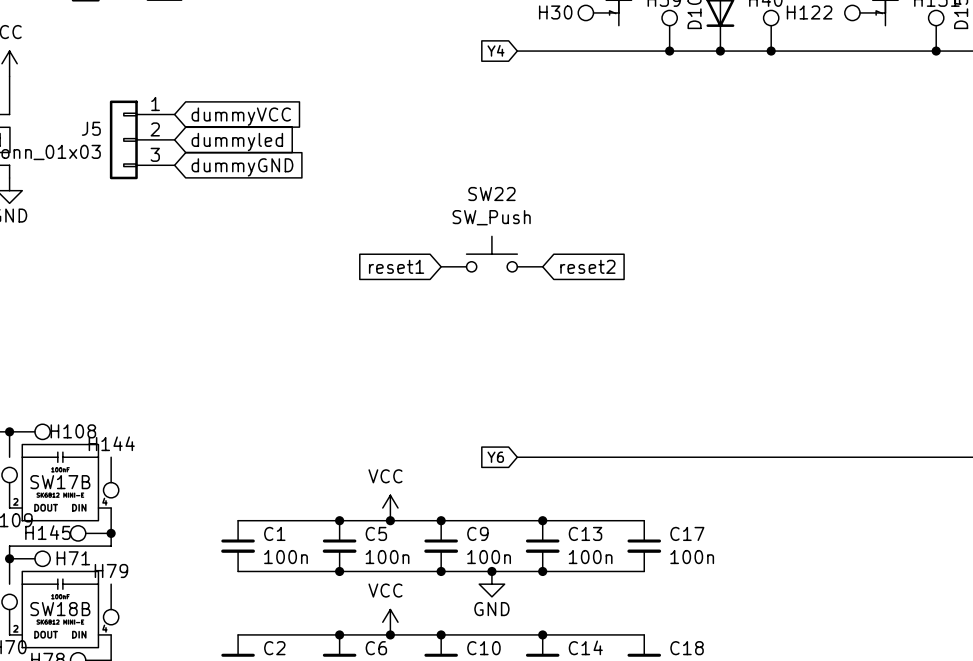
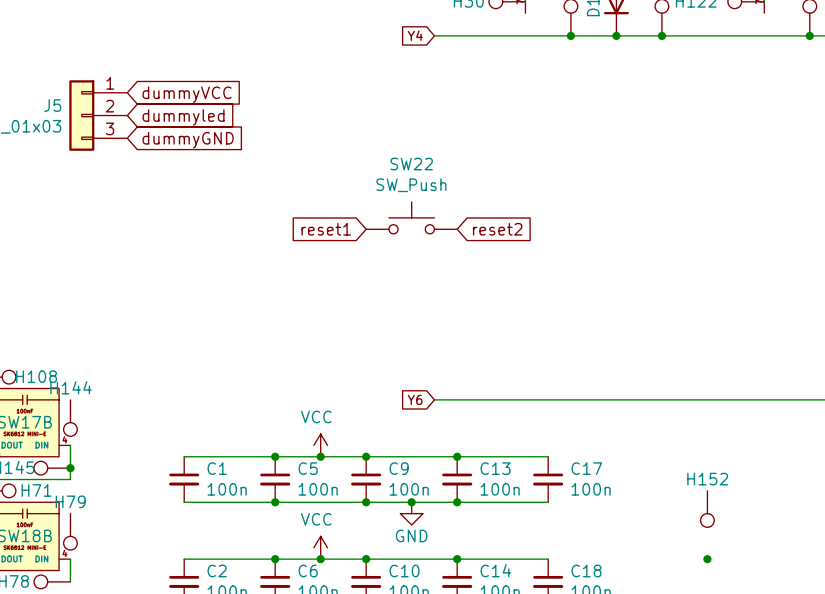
H152: none -> (707, 509)
junction: none -> (707, 559)

